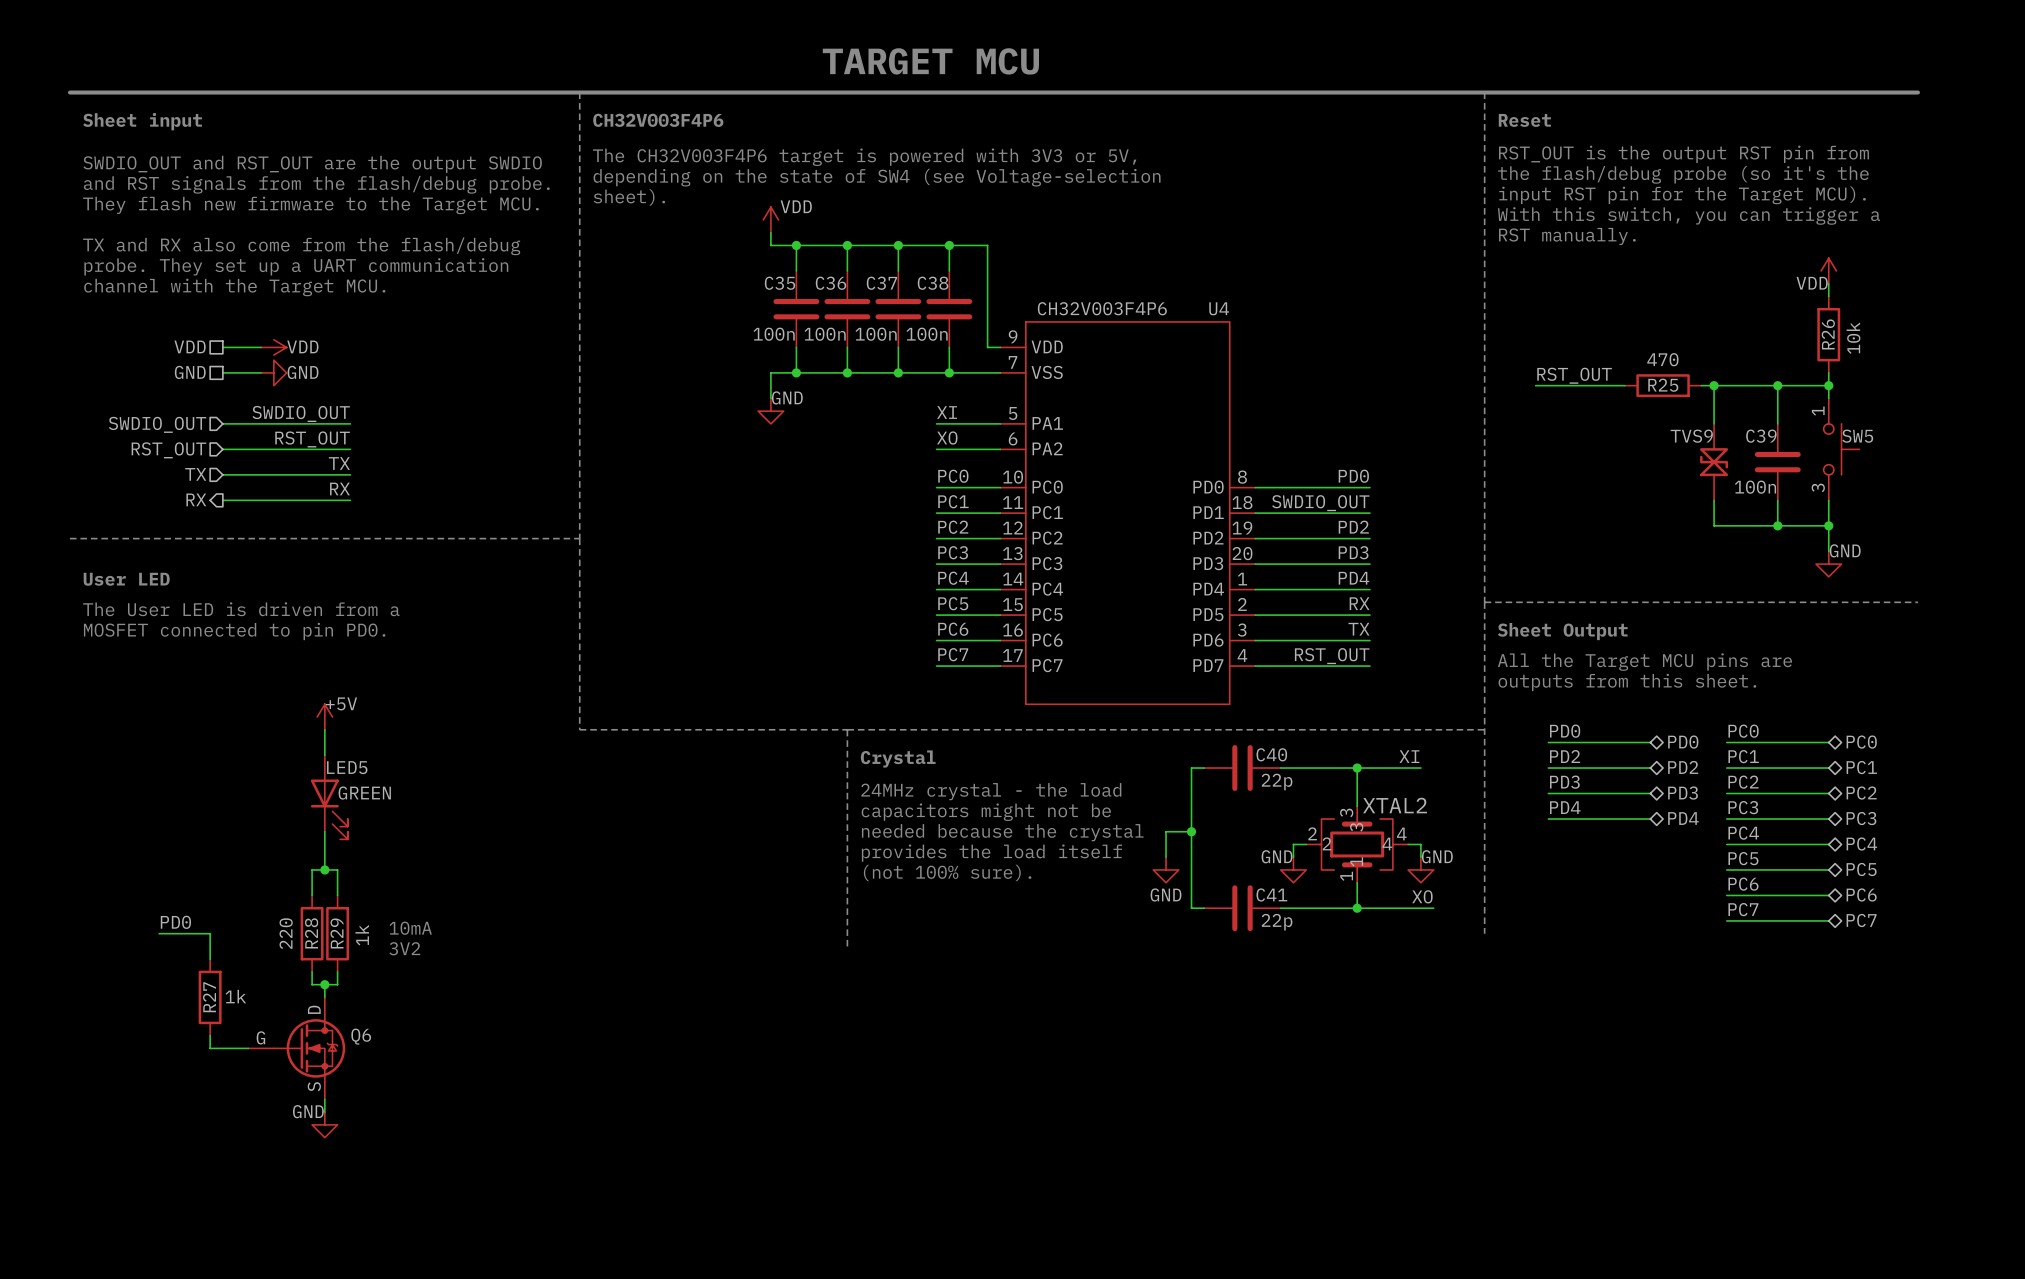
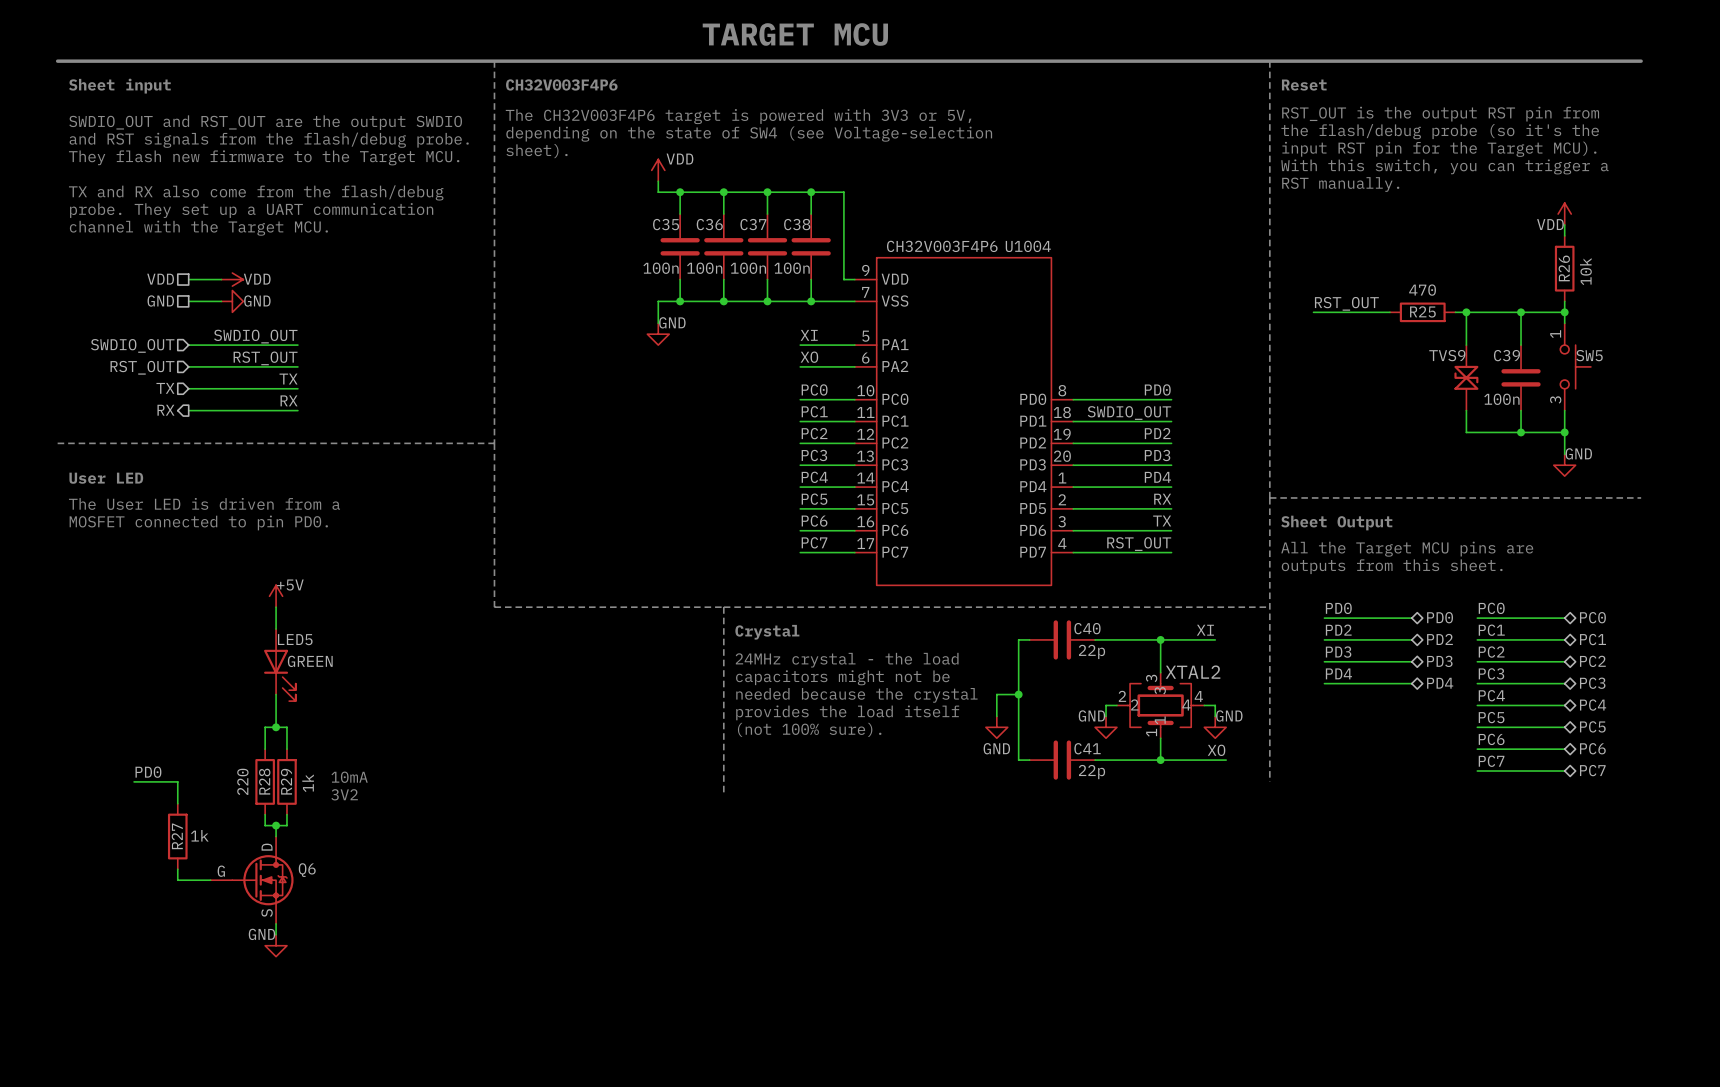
U4 name: U4 (1219, 308) -> U1004 (1028, 246)

